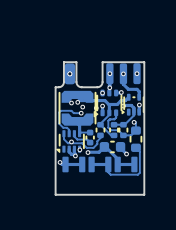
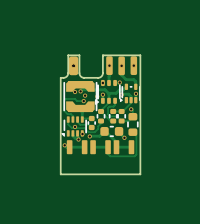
via: (109, 87) -> none

